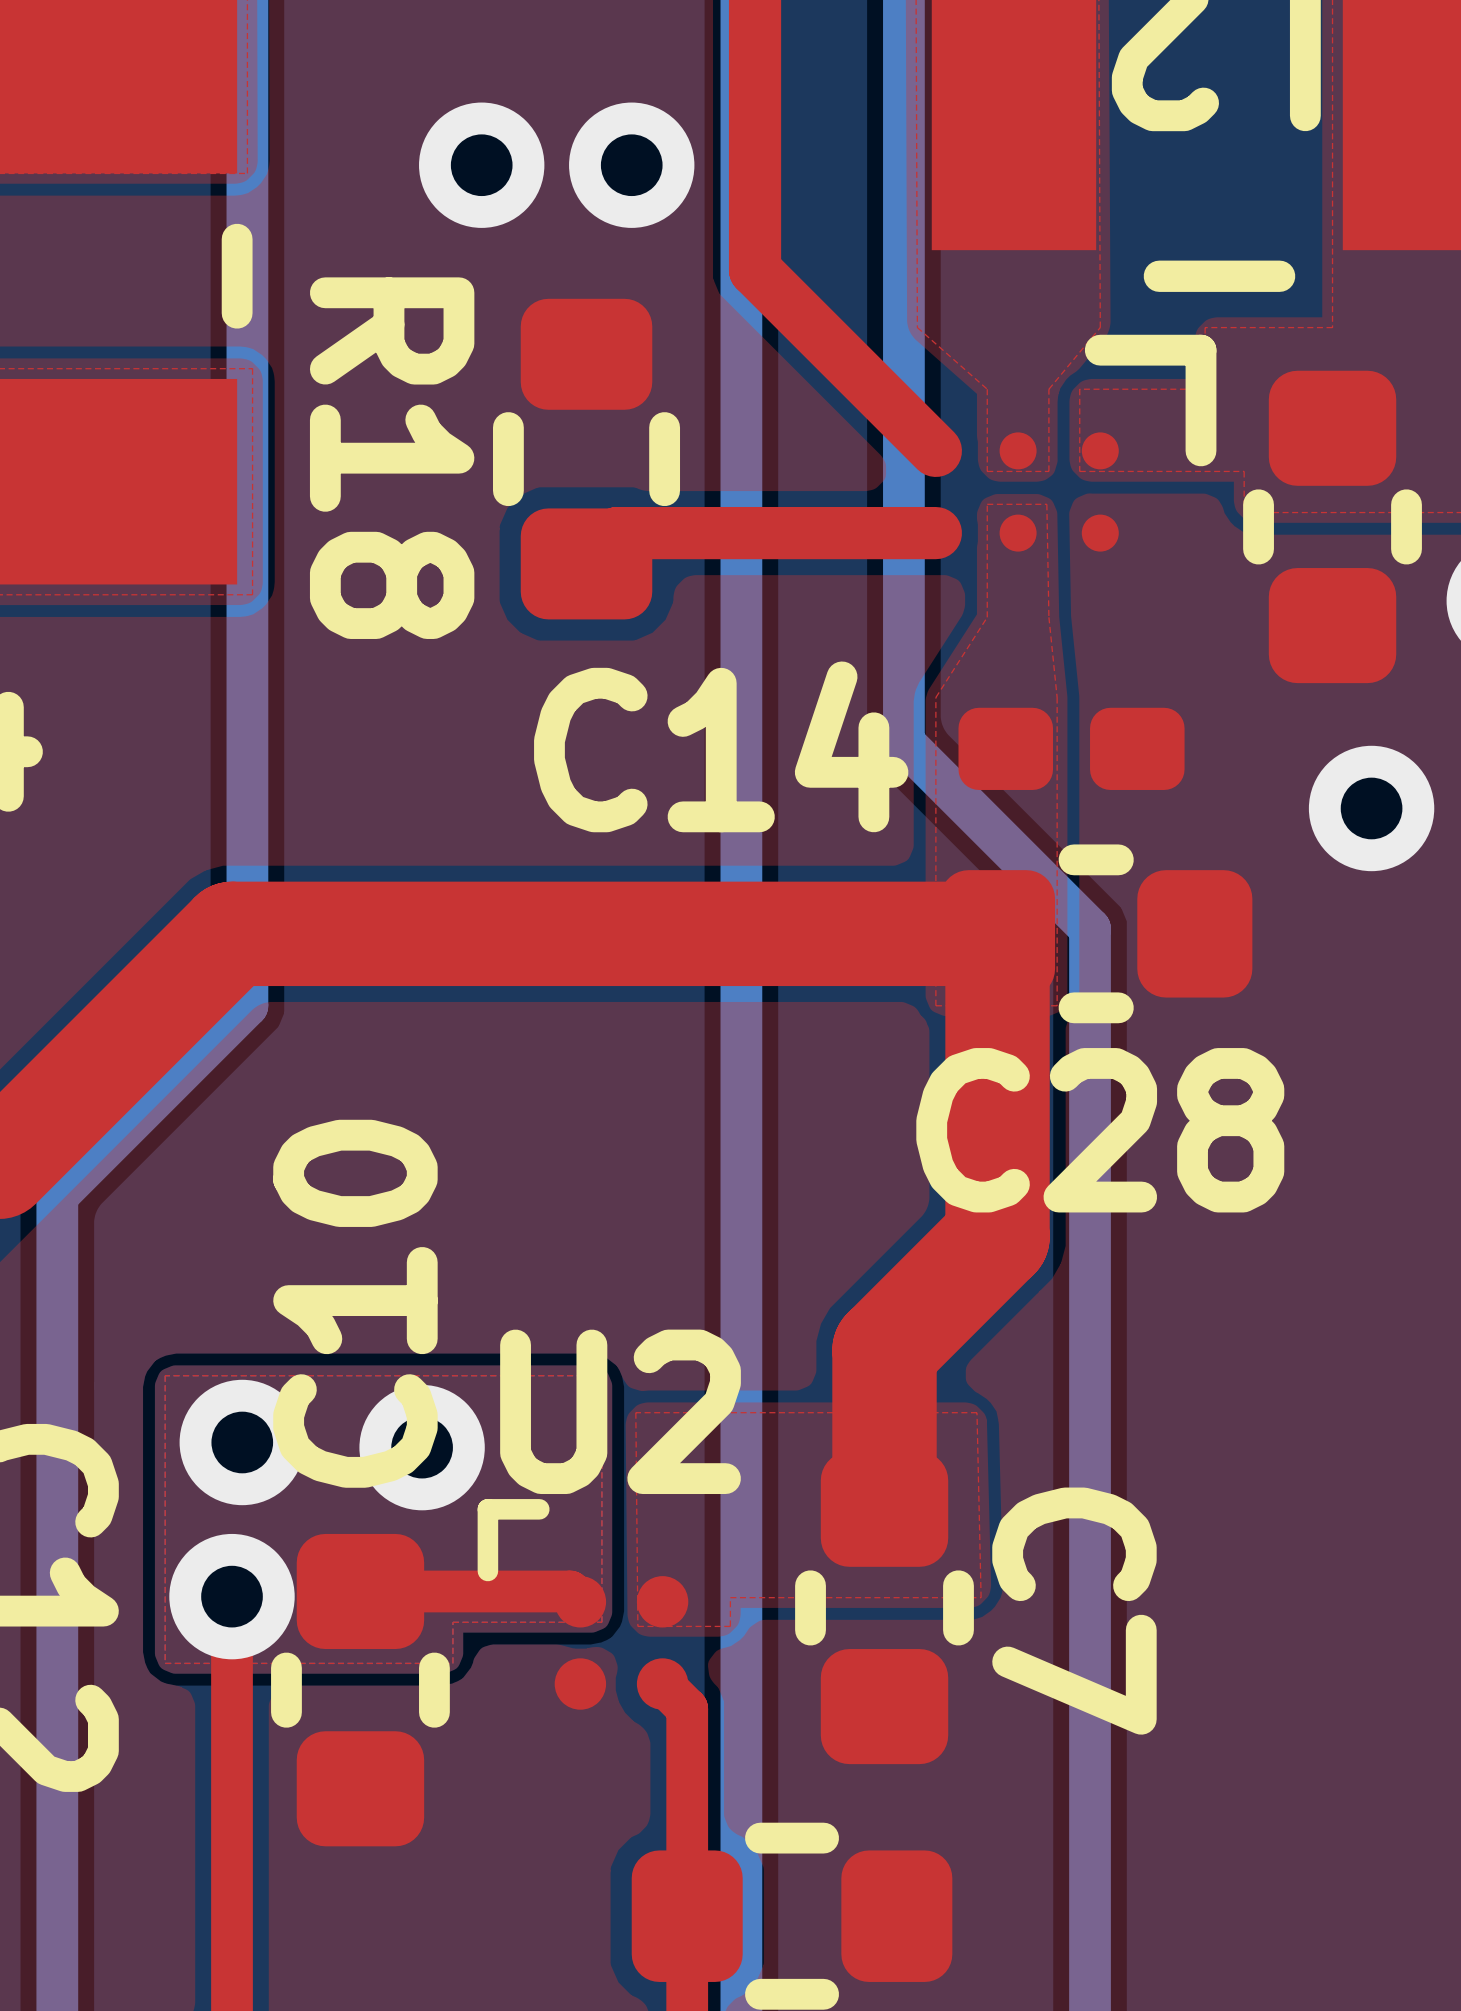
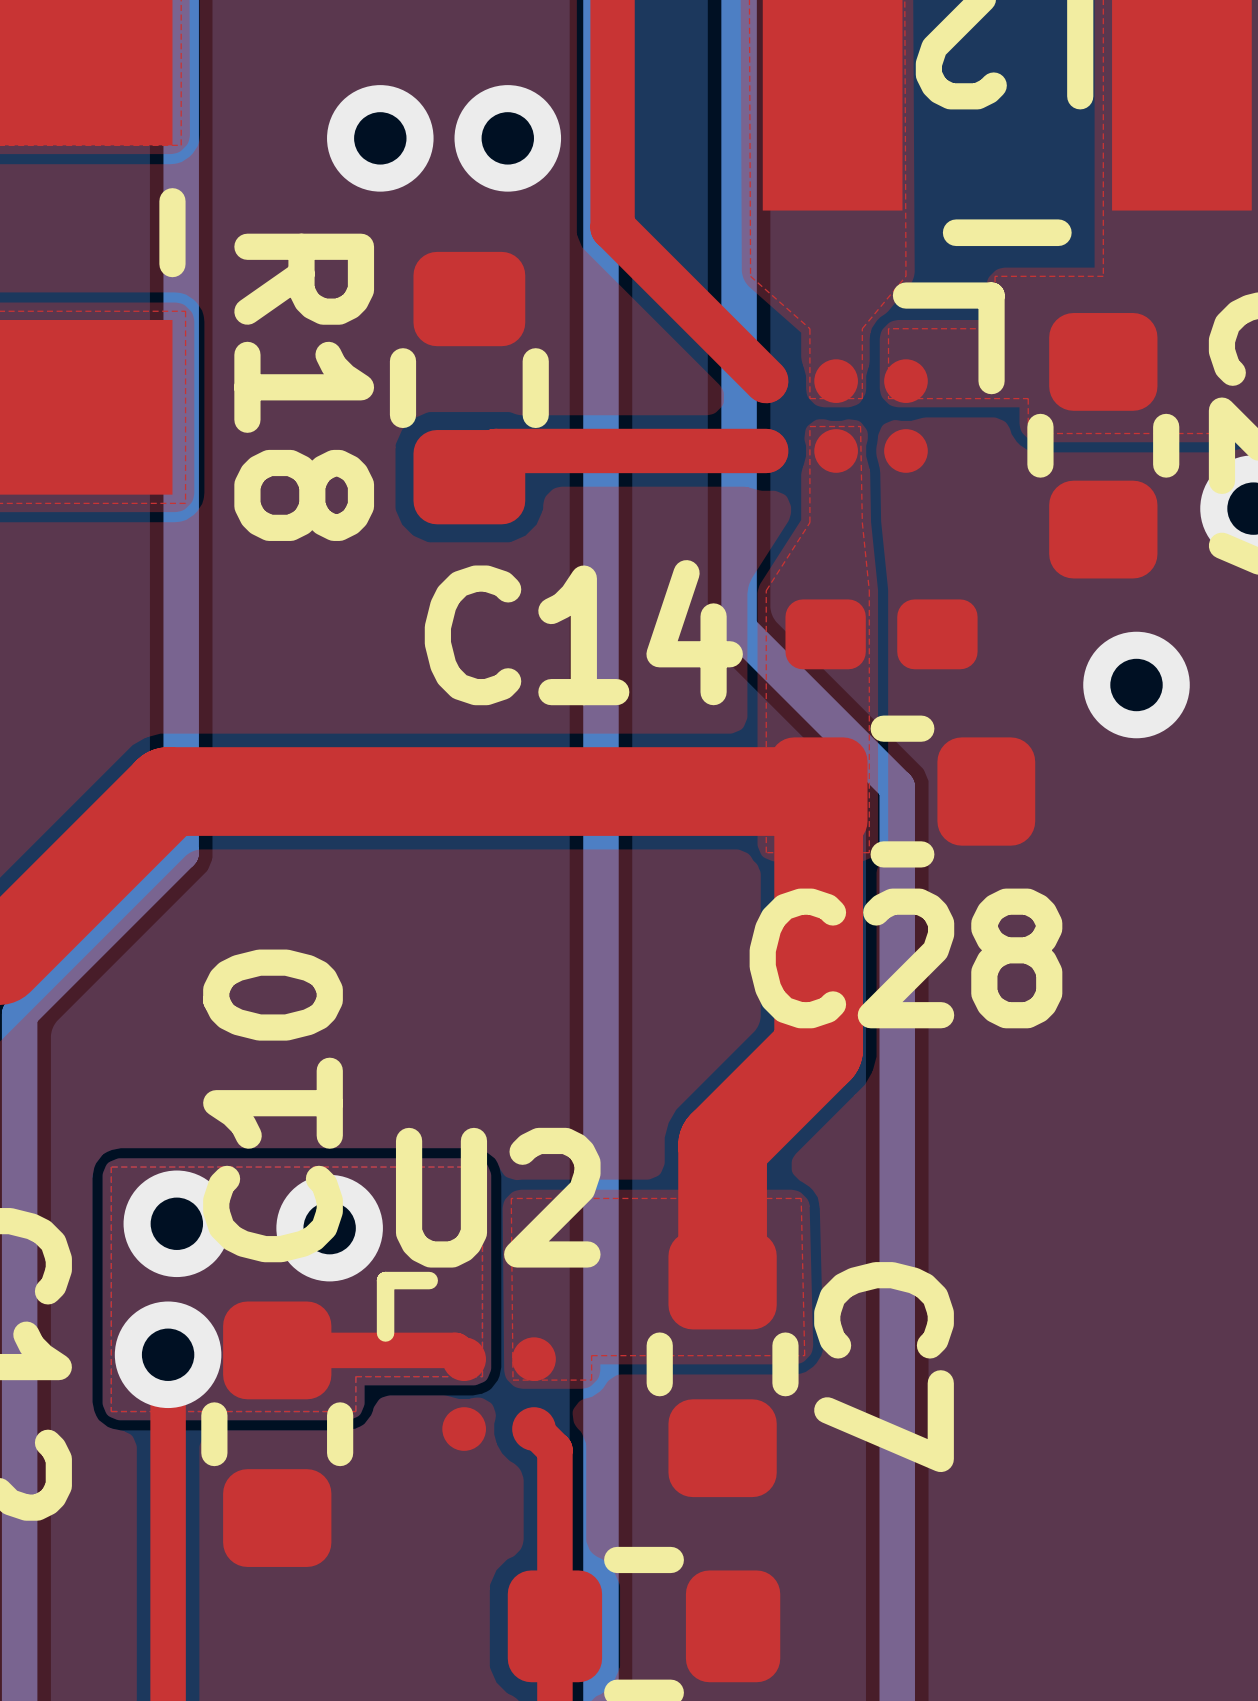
part footprint: [917, 432, 1119, 552] -> [744, 359, 928, 473]

